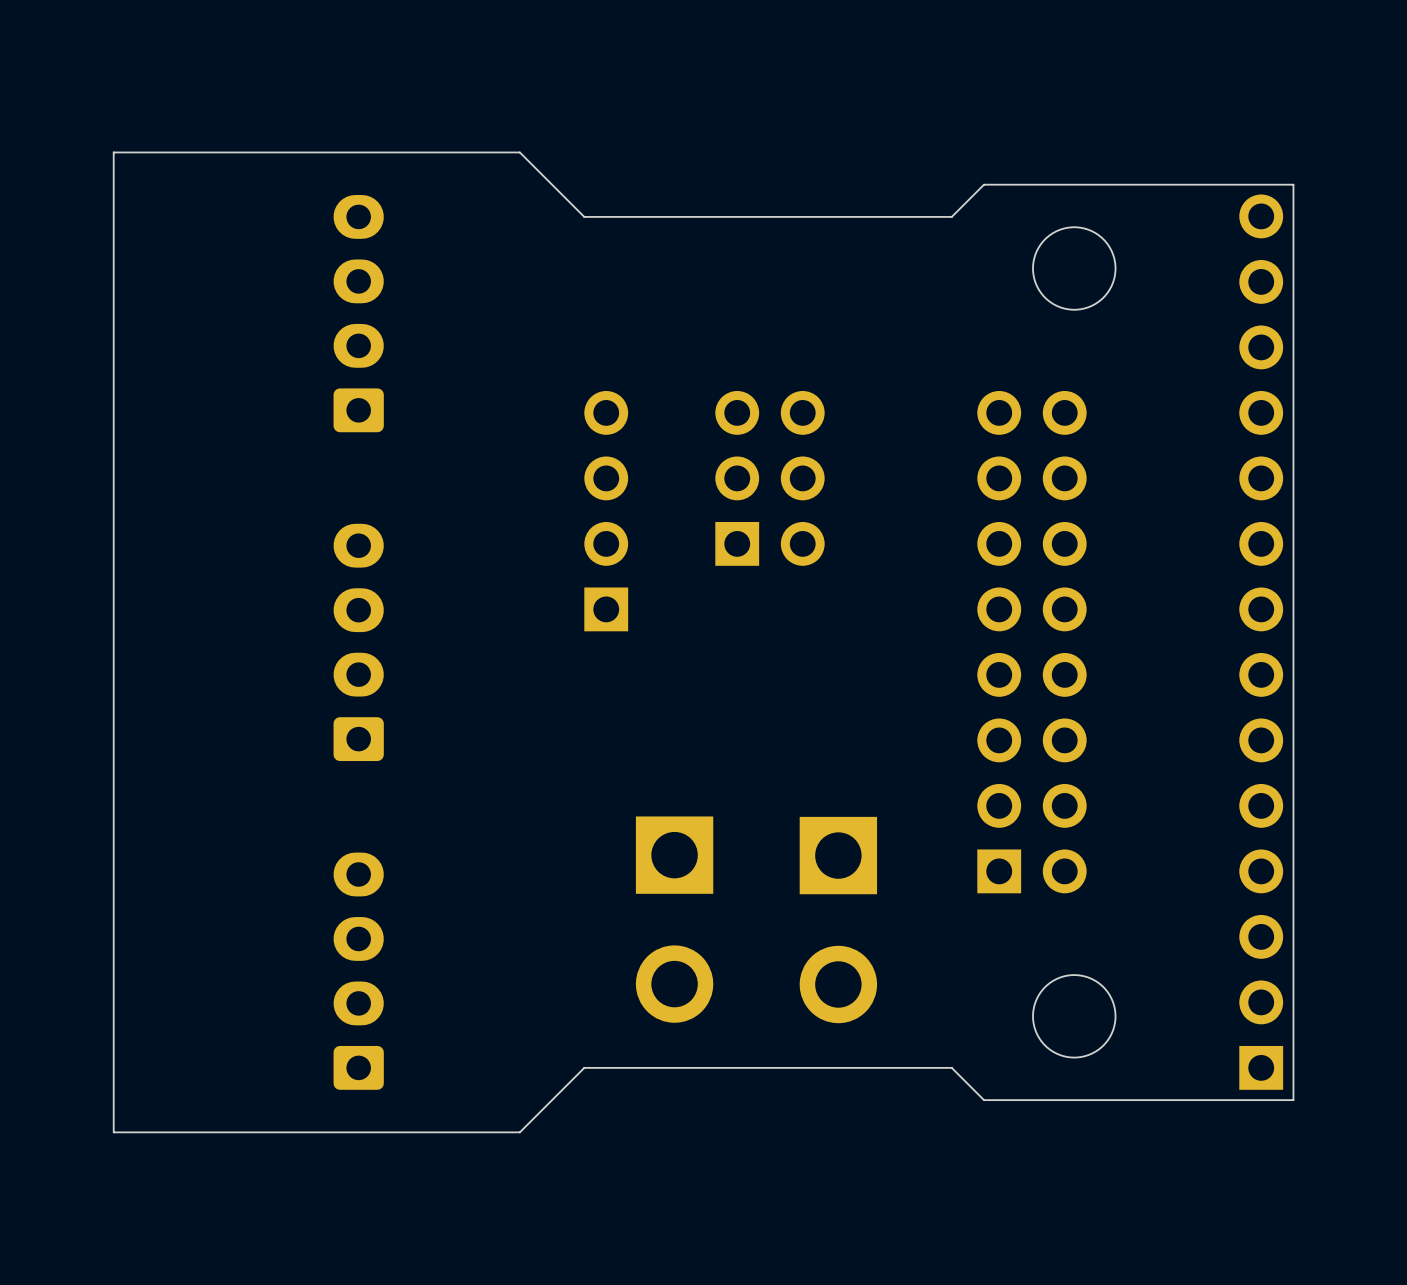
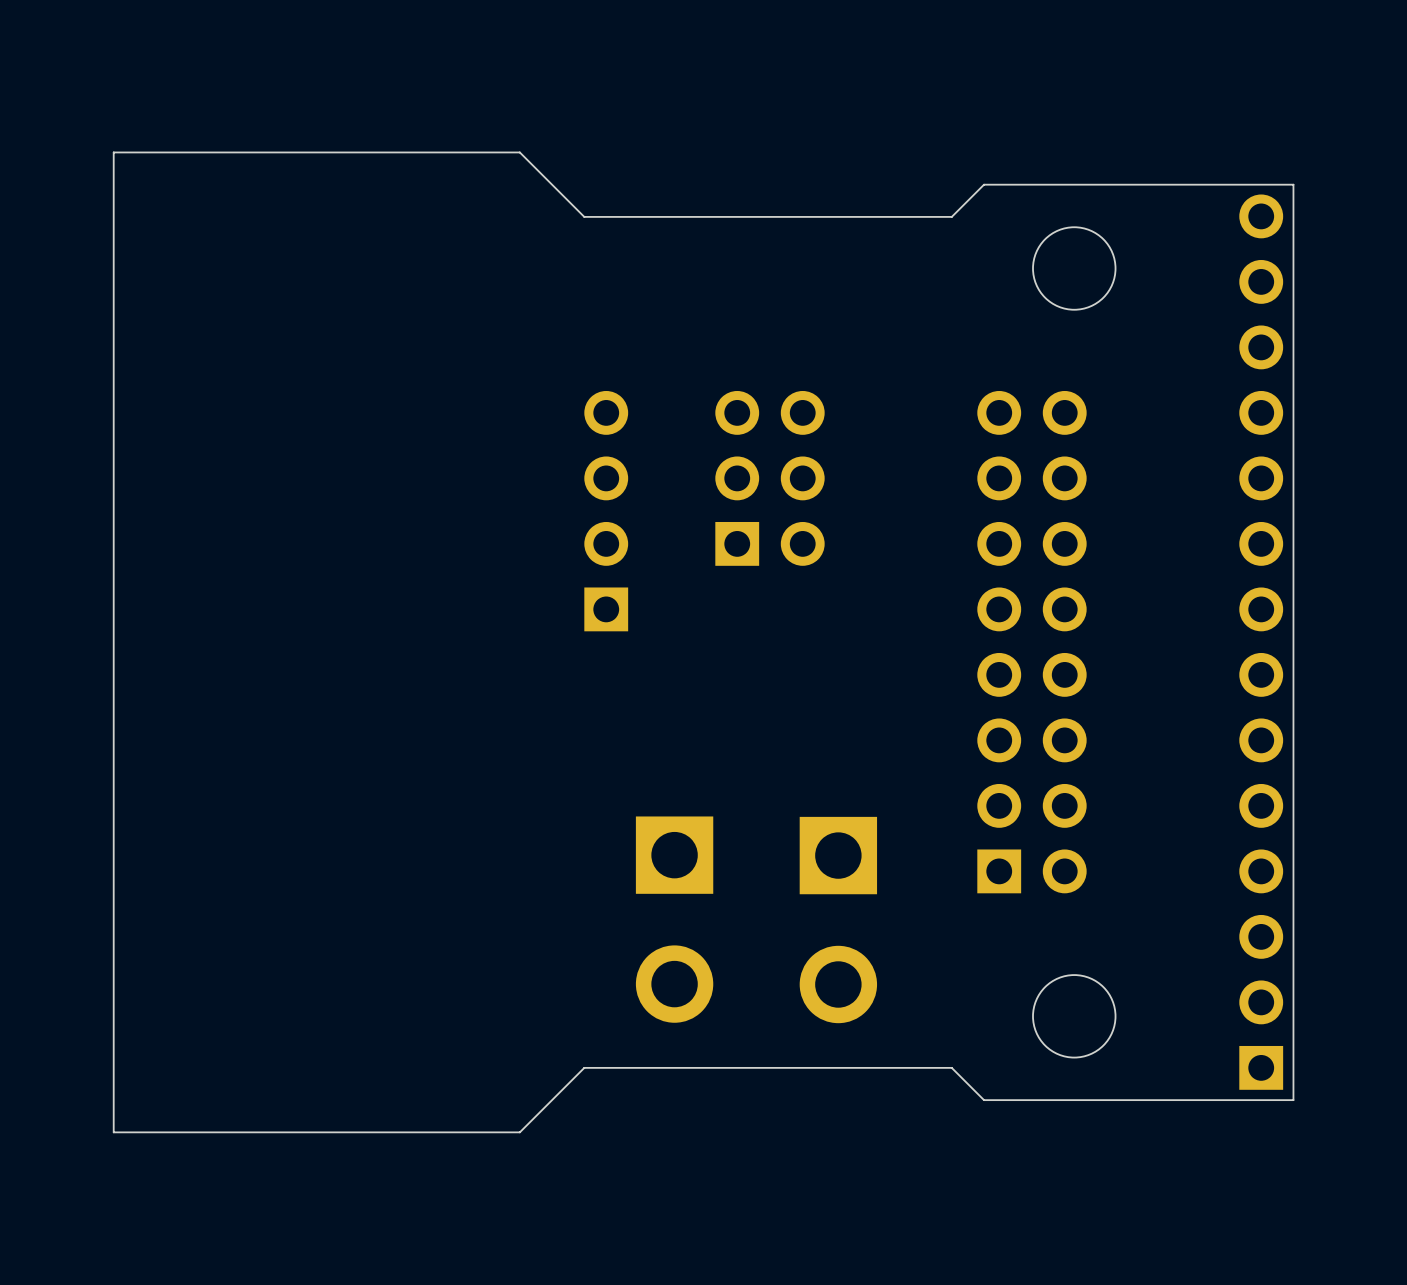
part: (358, 313) -> none
part: (358, 642) -> none
part: (358, 971) -> none

